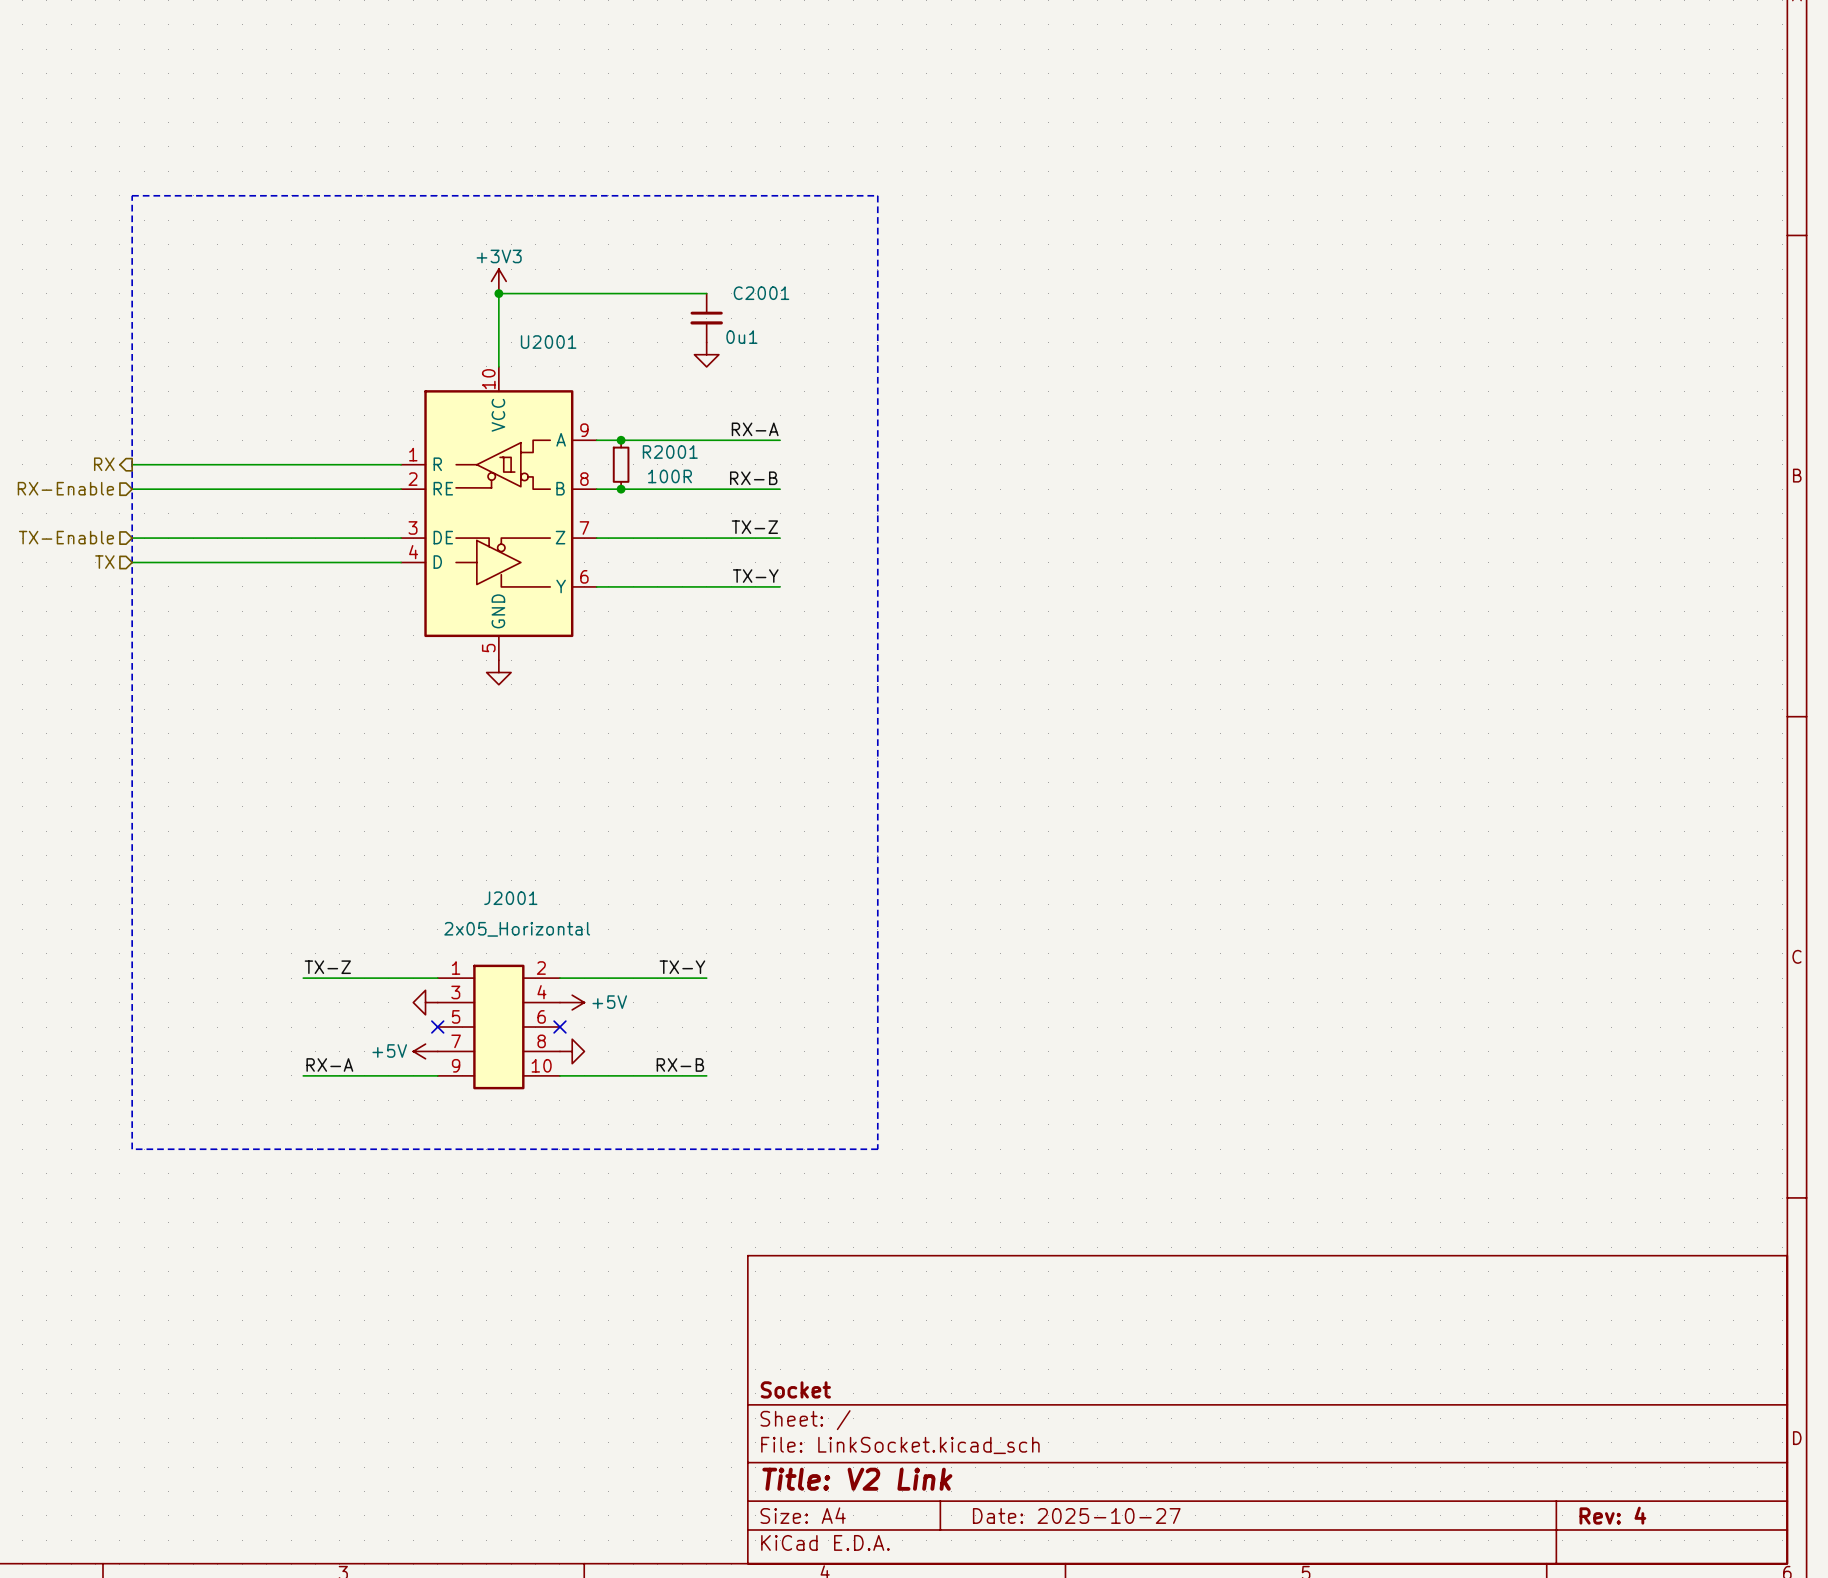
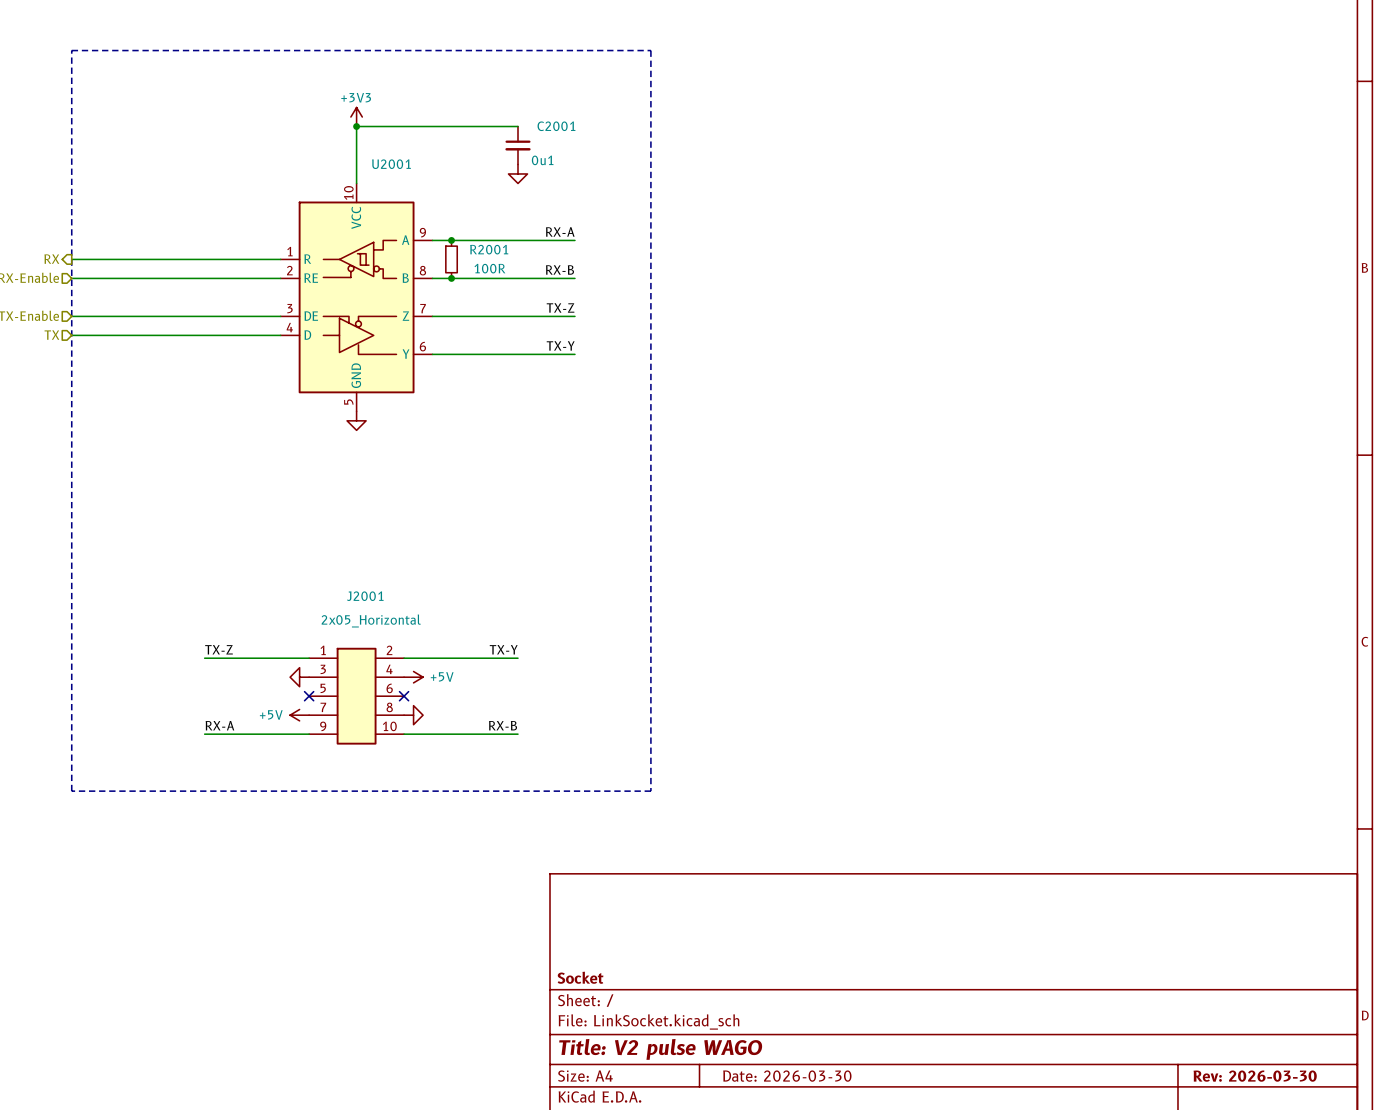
title block: Title: V2 Link (857, 1479) -> Title: V2 pulse WAGO (660, 1049)
title block: Date: 2025-10-27 (1076, 1515) -> Date: 2026-03-30 (787, 1076)
title block: Rev: 4 (1612, 1515) -> Rev: 2026-03-30 (1255, 1076)

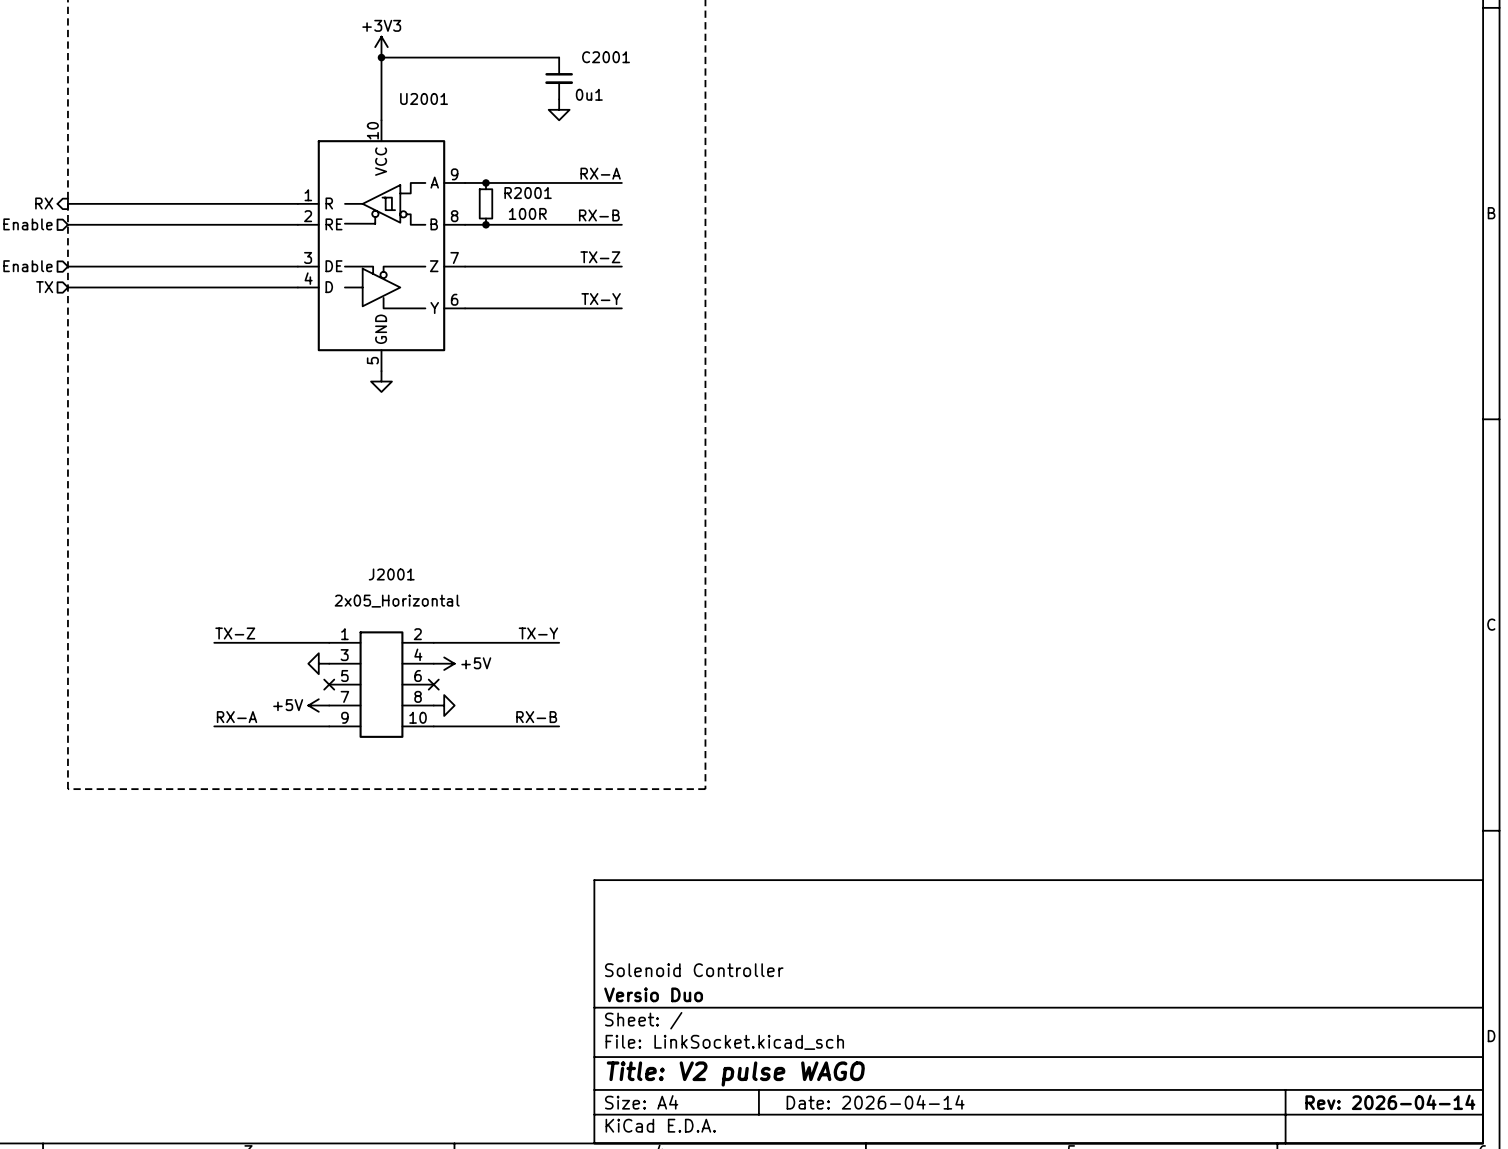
title block: none -> Solenoid Controller (694, 970)
title block: Socket (580, 977) -> Versio Duo (653, 994)
title block: Date: 2026-03-30 (787, 1076) -> Date: 2026-04-14 (875, 1102)
title block: Rev: 2026-03-30 (1255, 1076) -> Rev: 2026-04-14 (1390, 1102)

